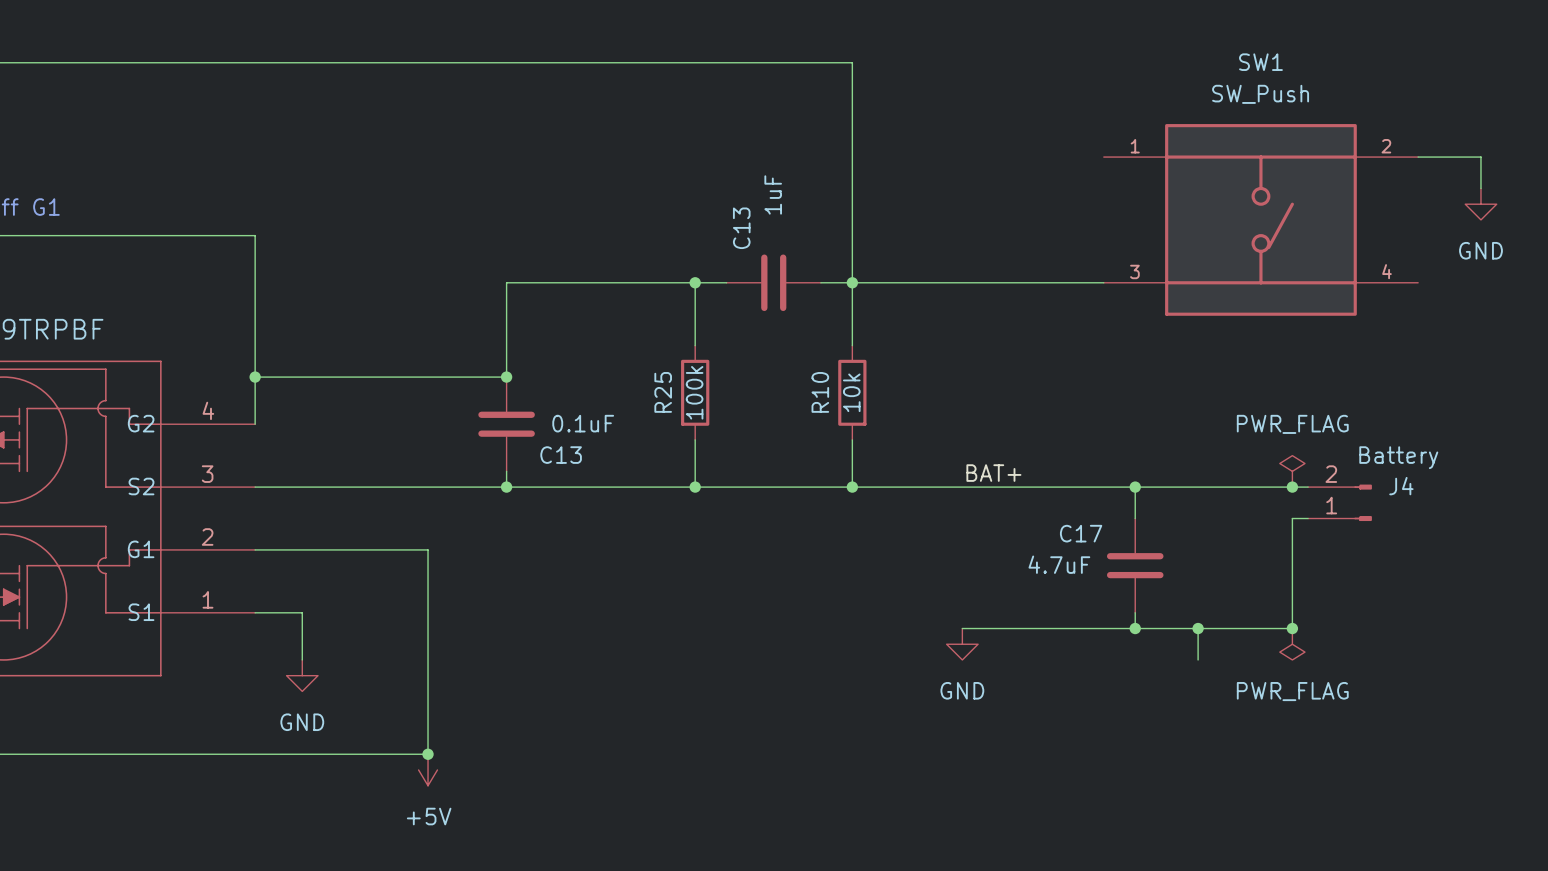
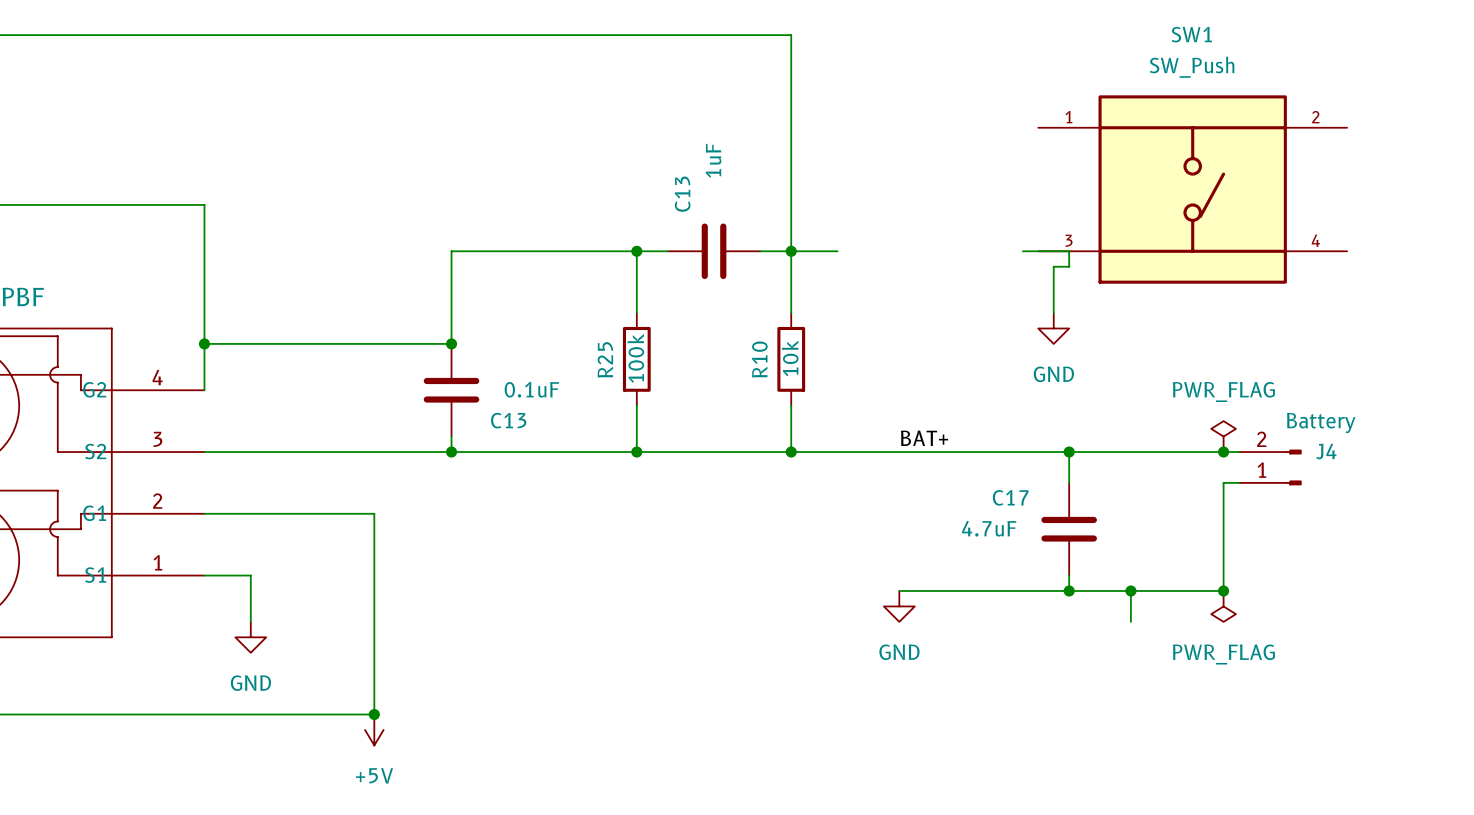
wire: (1418, 157) (1480, 157) (1480, 188) -> none
power symbol: GND (1480, 204) -> none
wire: (899, 282) (1088, 282) -> none
wire: none -> (1038, 251) (1069, 251) (1069, 266) (1053, 266) (1053, 313)
power symbol: none -> GND (1053, 328)

